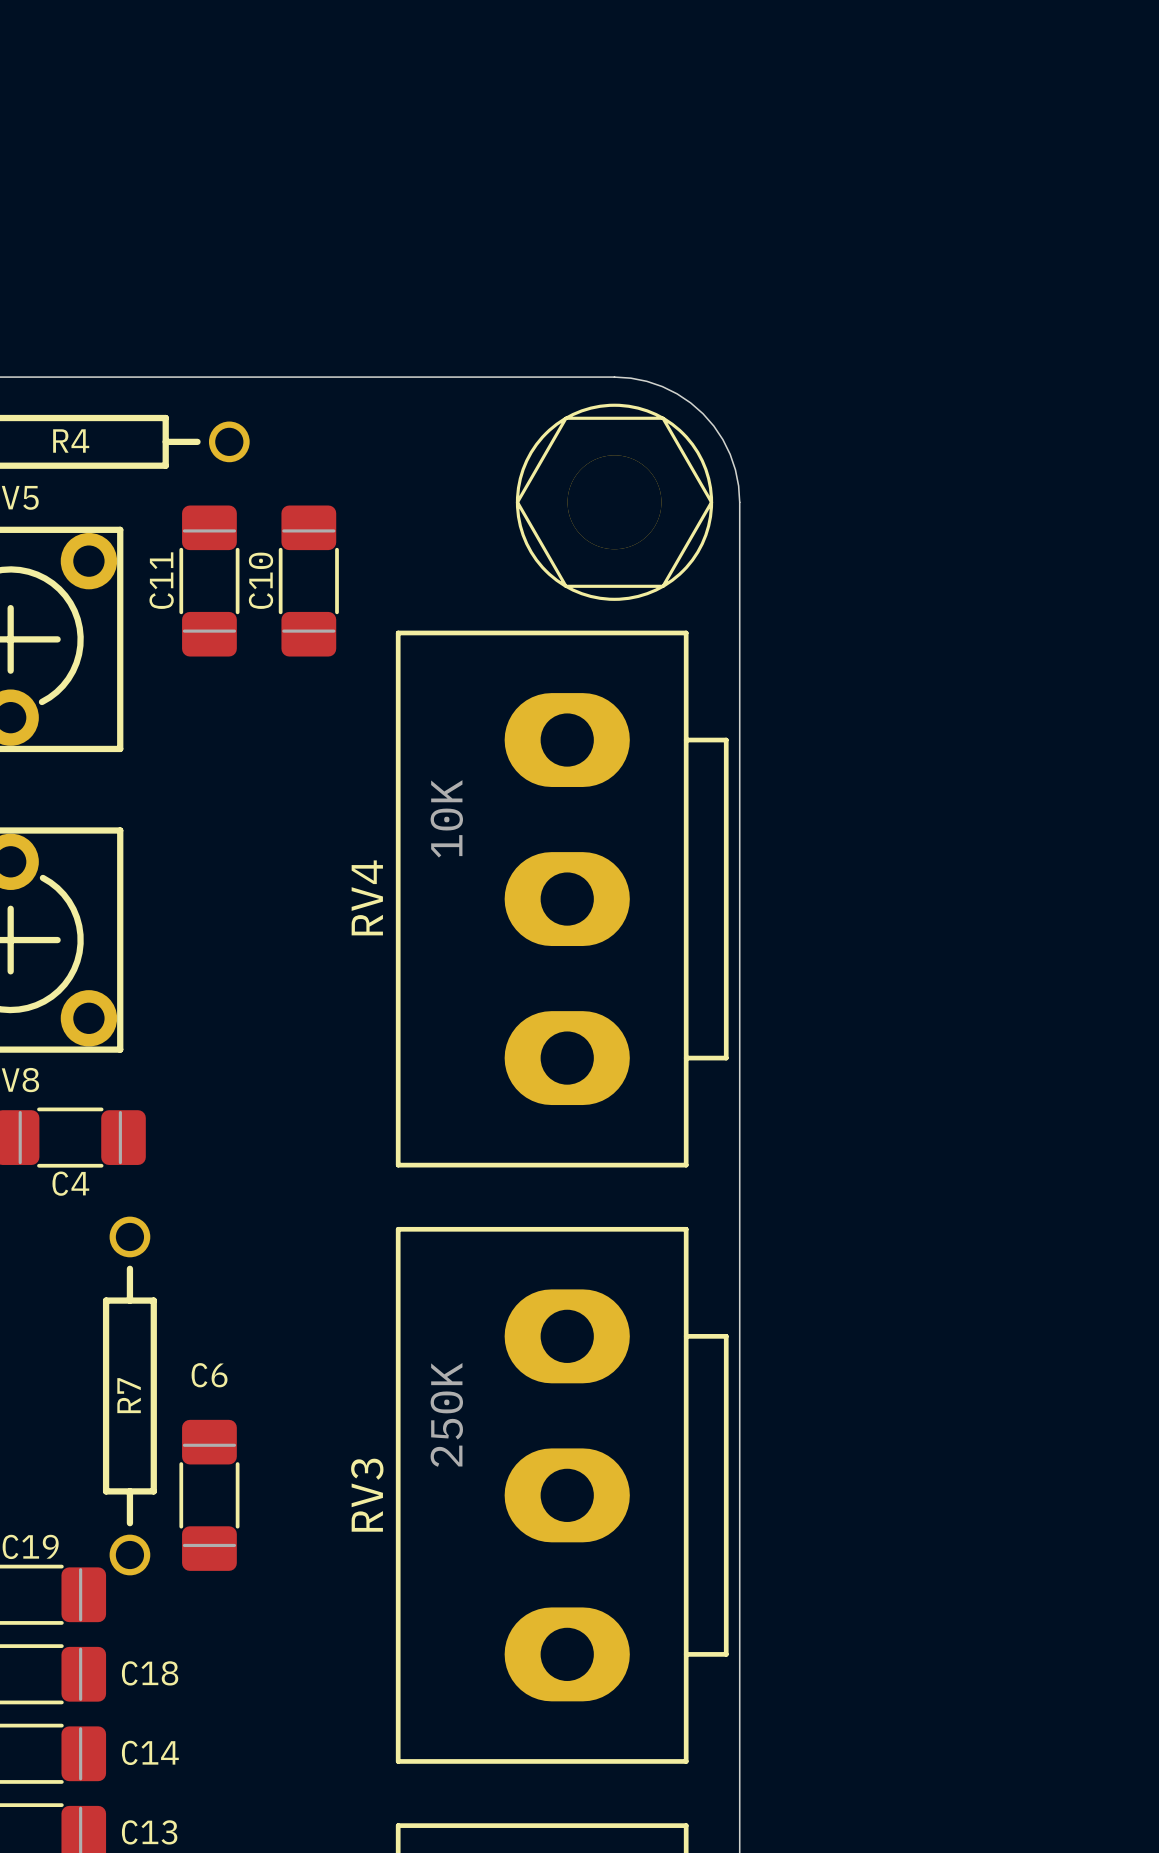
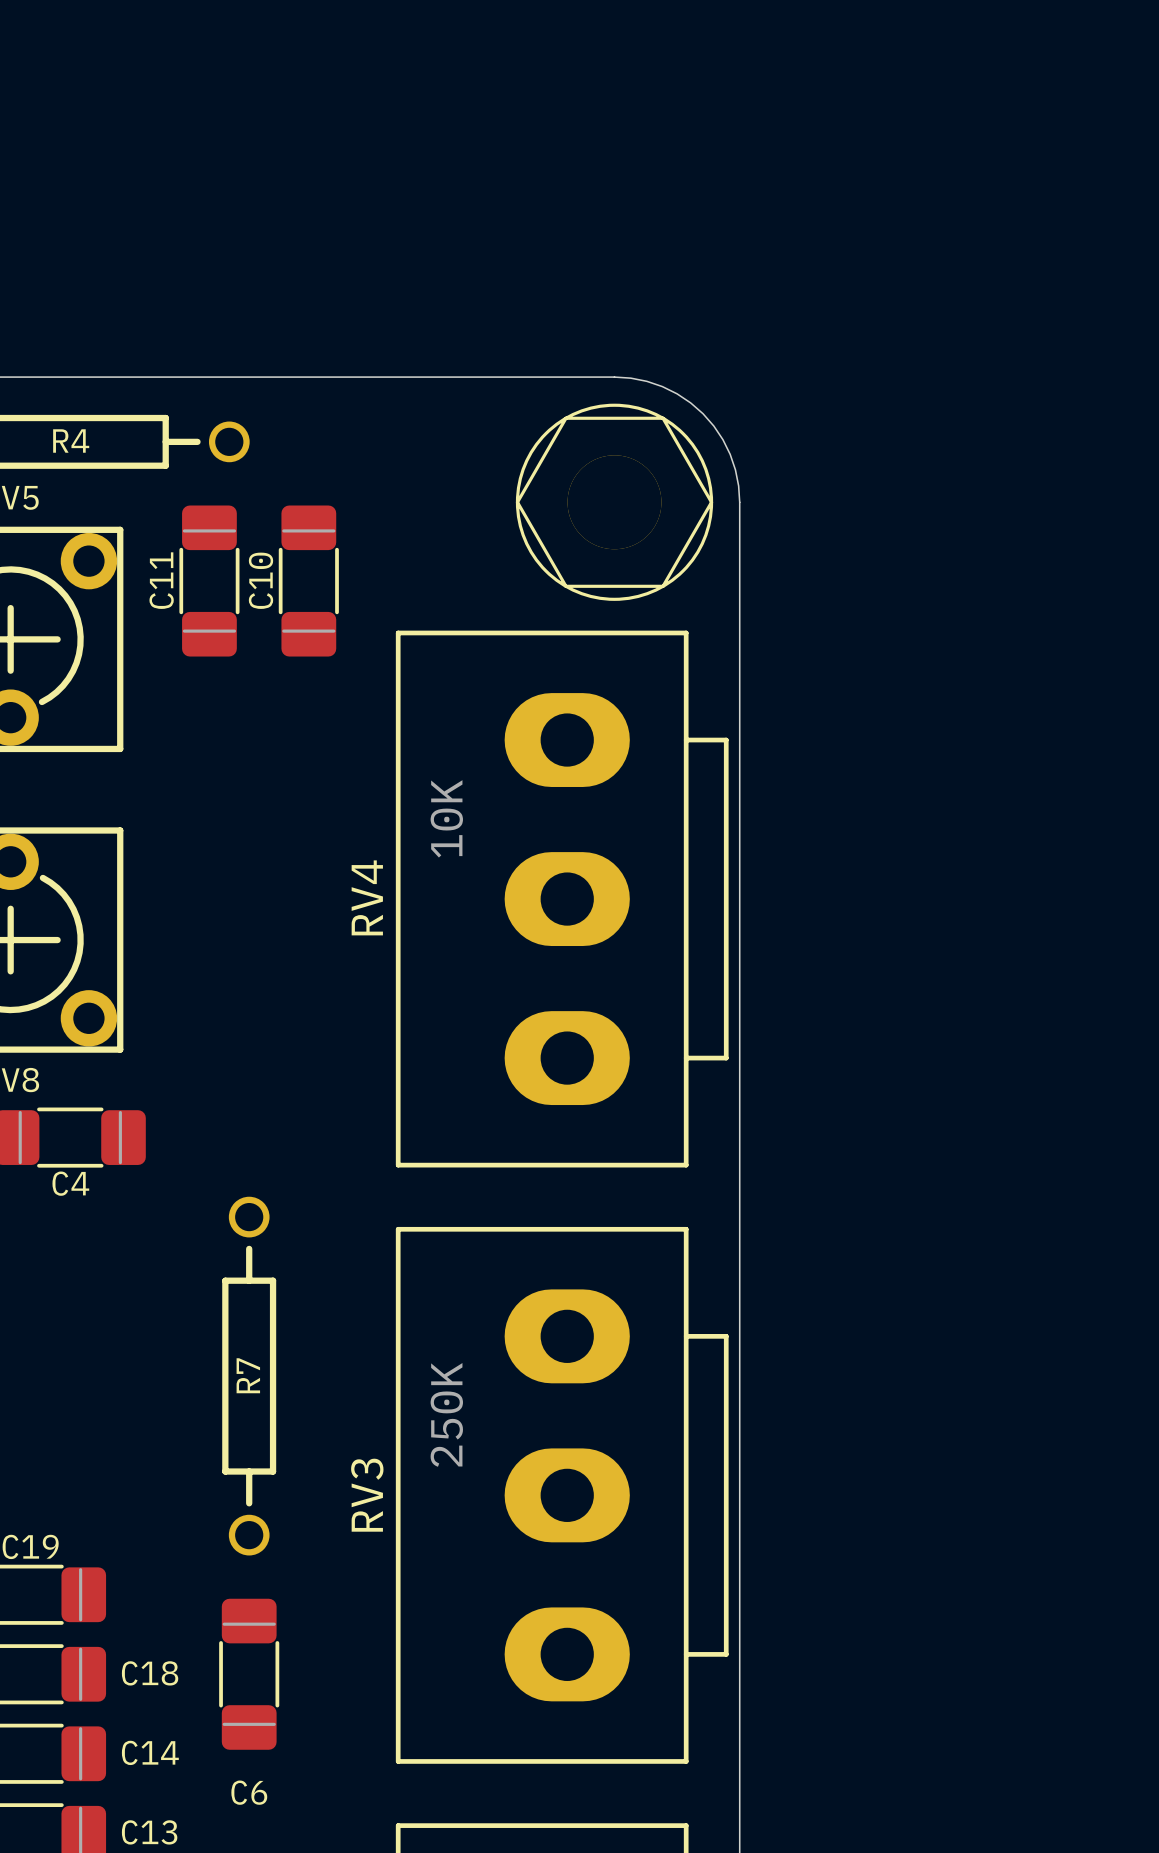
C6 name position: C6 (209, 1375) -> C6 (249, 1792)
R7 position: (129, 1395) -> (249, 1376)
C6 position: (209, 1495) -> (249, 1674)

